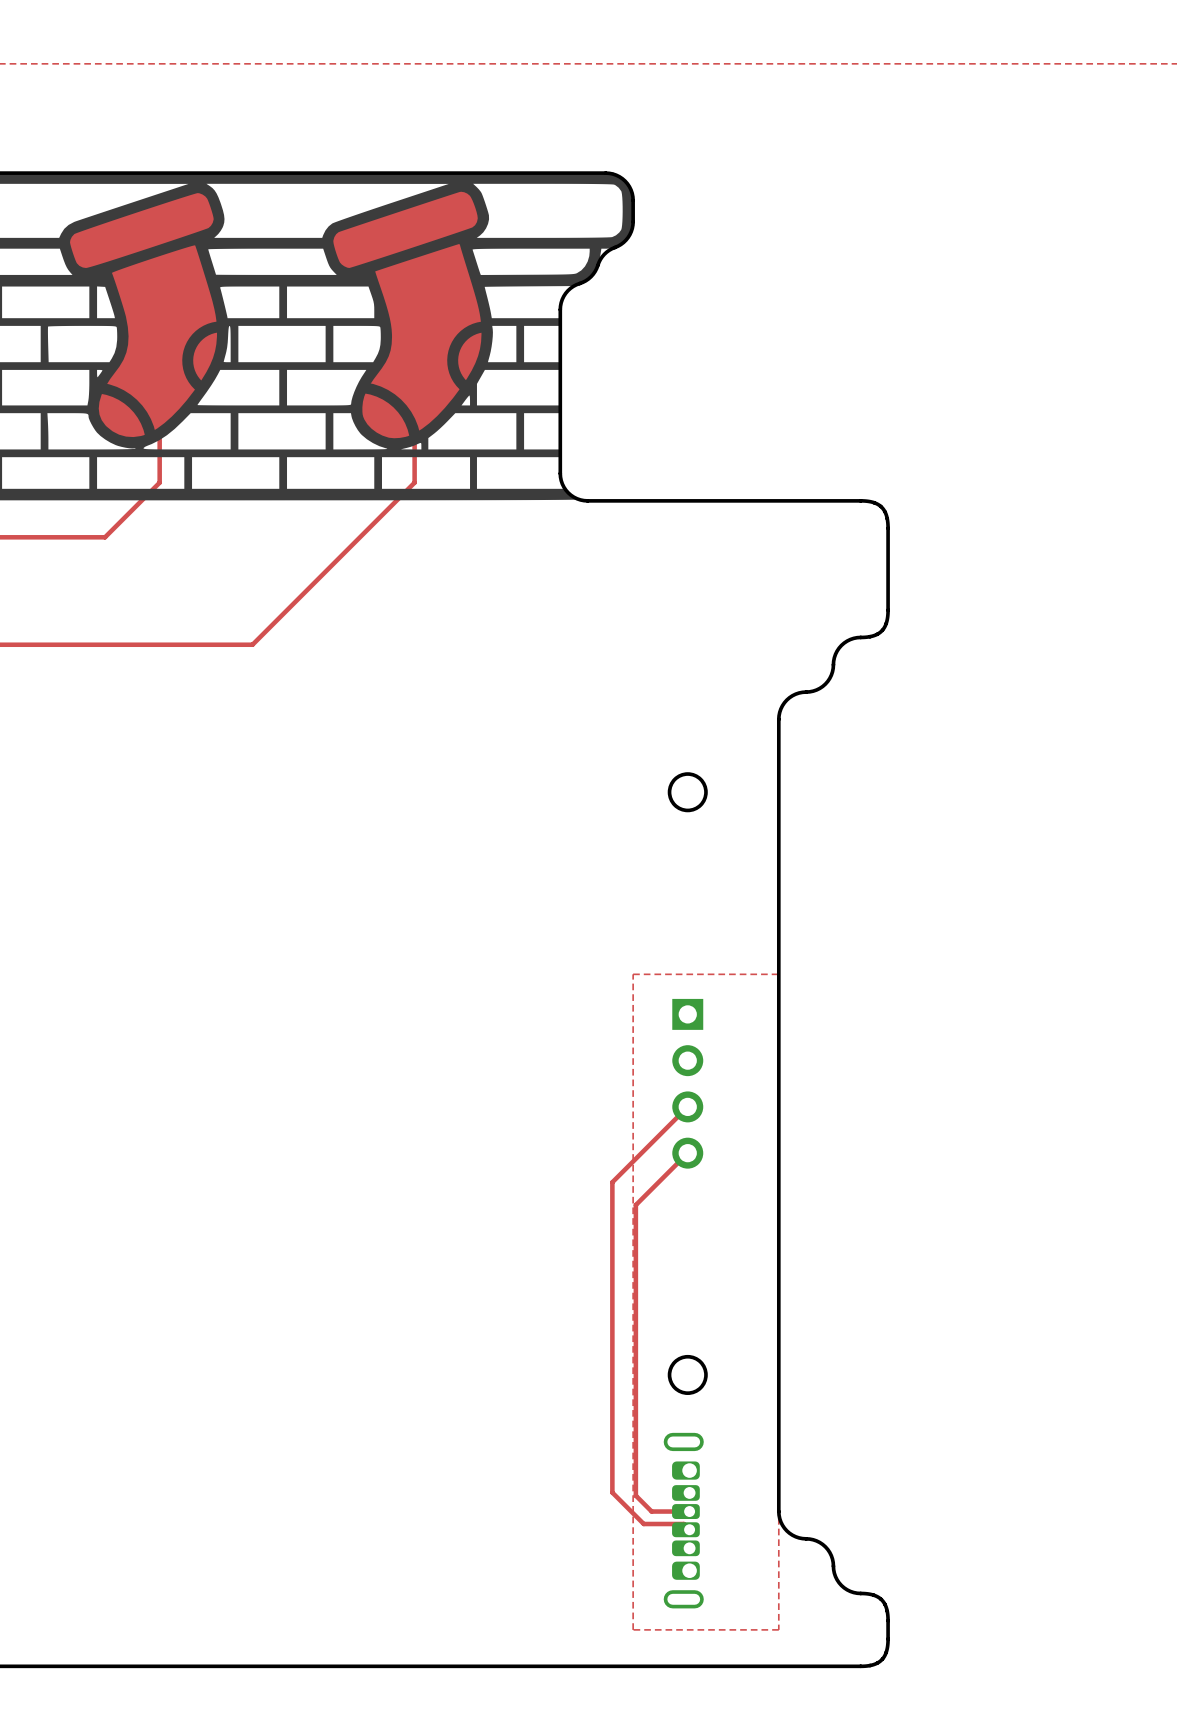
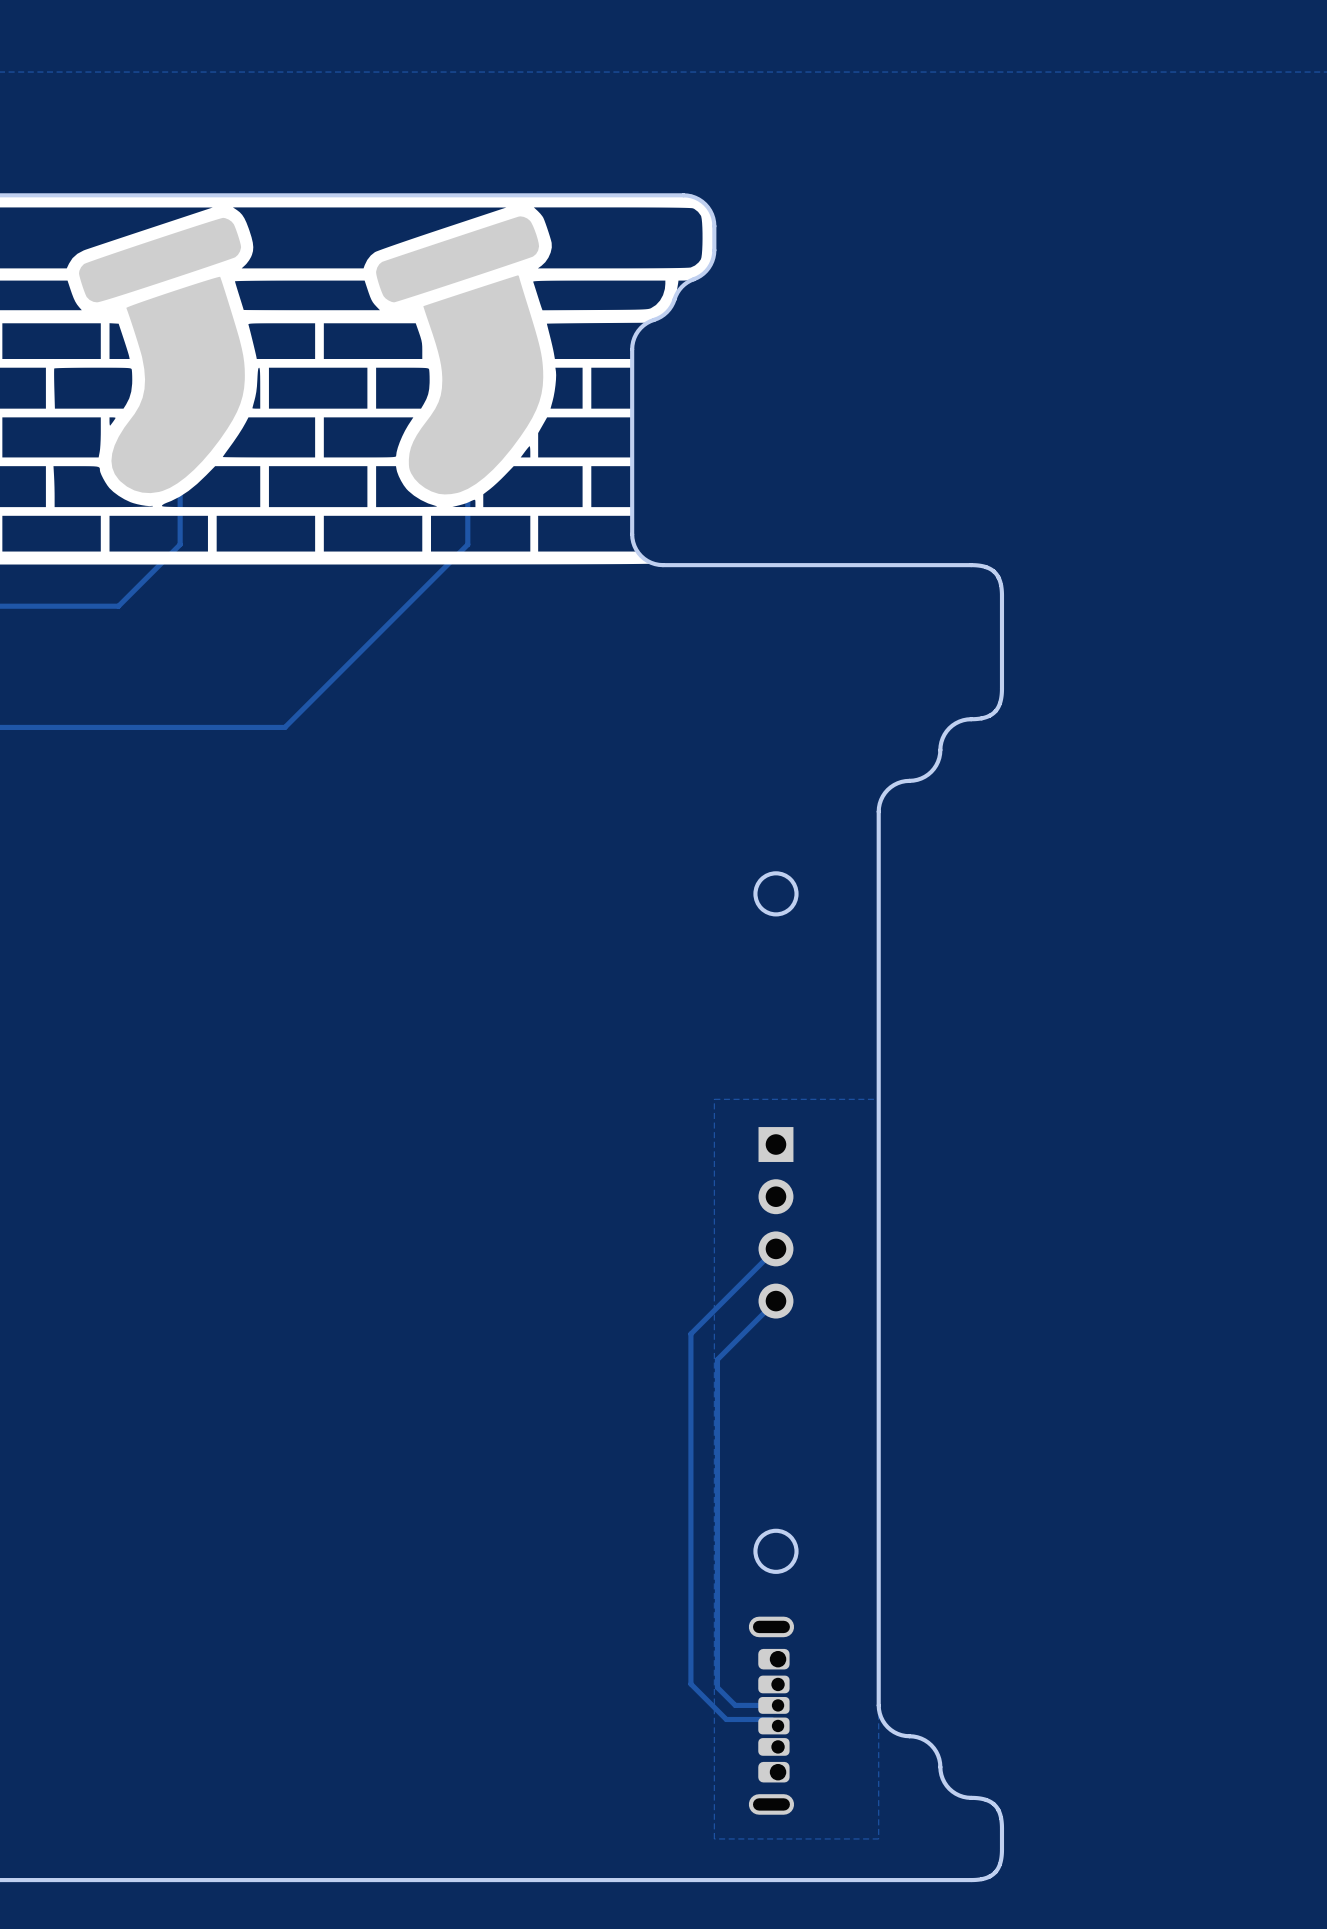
line: (217, 327) (199, 335) (188, 352) (189, 371) (201, 387) -> none
line: (482, 327) (464, 335) (453, 352) (454, 371) (466, 387) -> none
line: (364, 387) (378, 391) (397, 403) (406, 414) (414, 435) -> none
line: (100, 388) (114, 391) (133, 403) (145, 421) (150, 435) -> none

